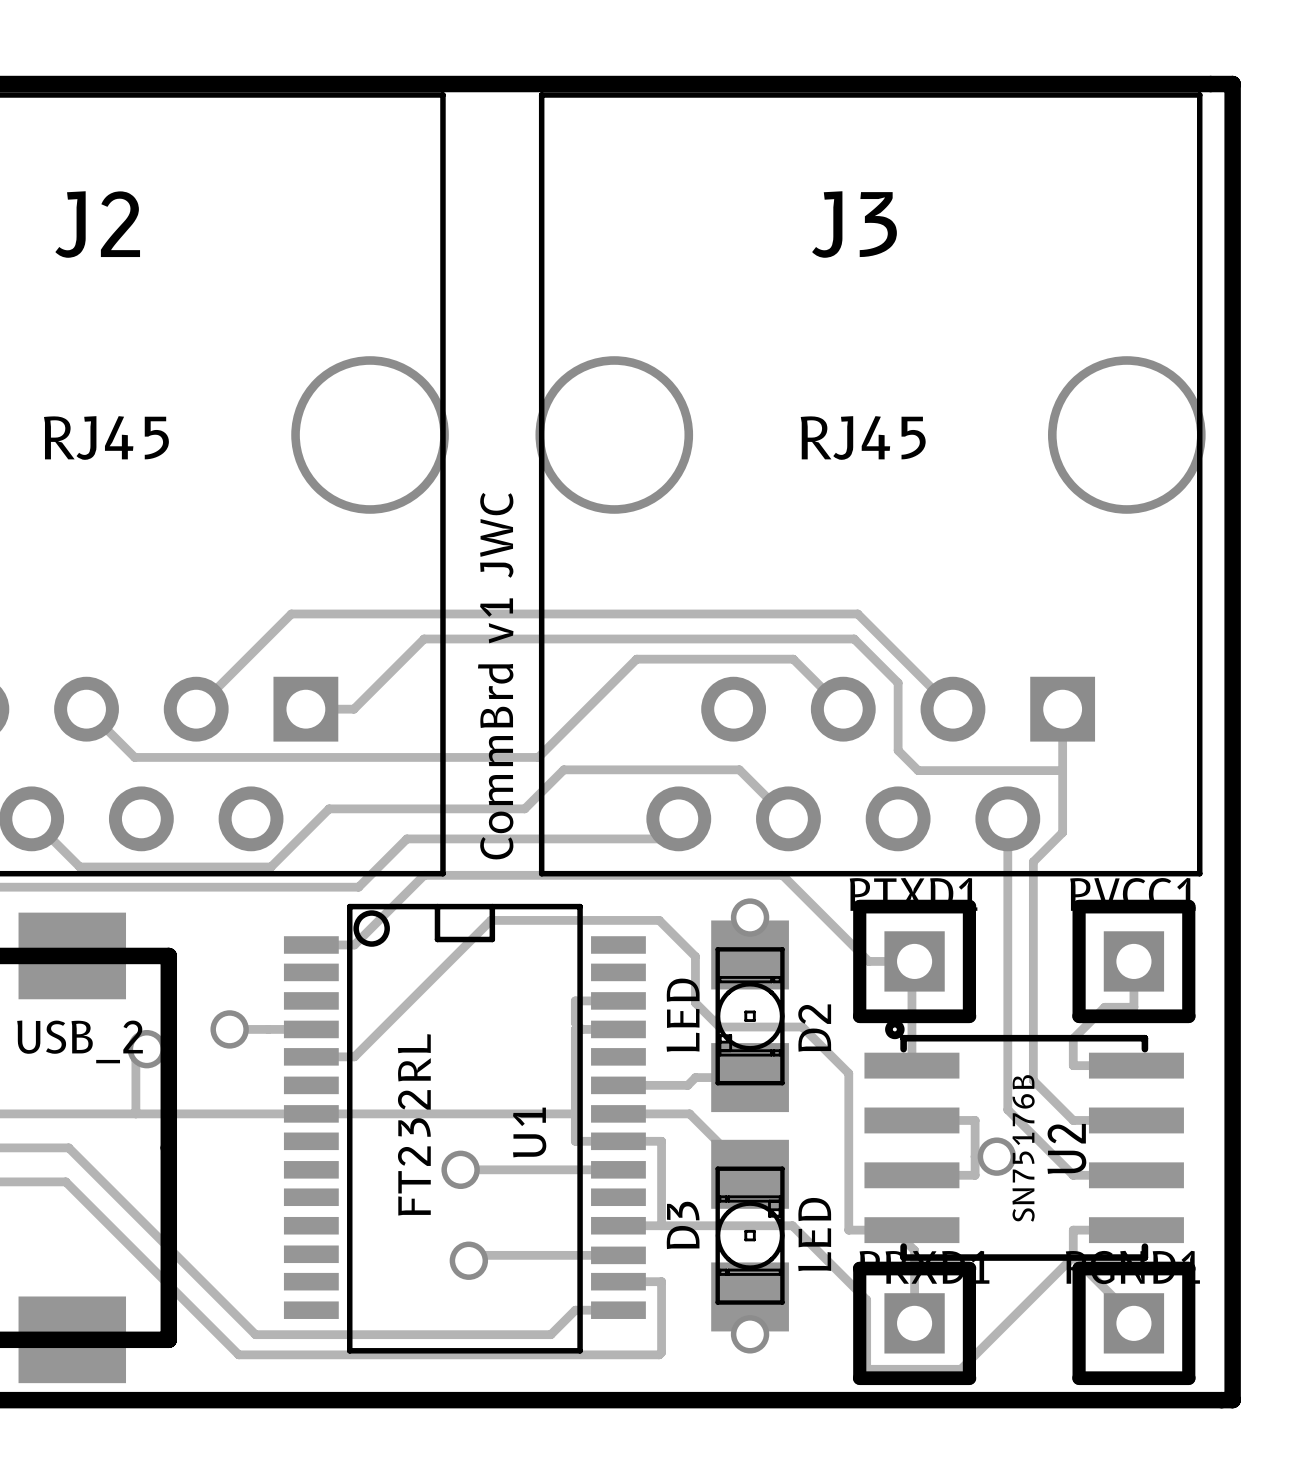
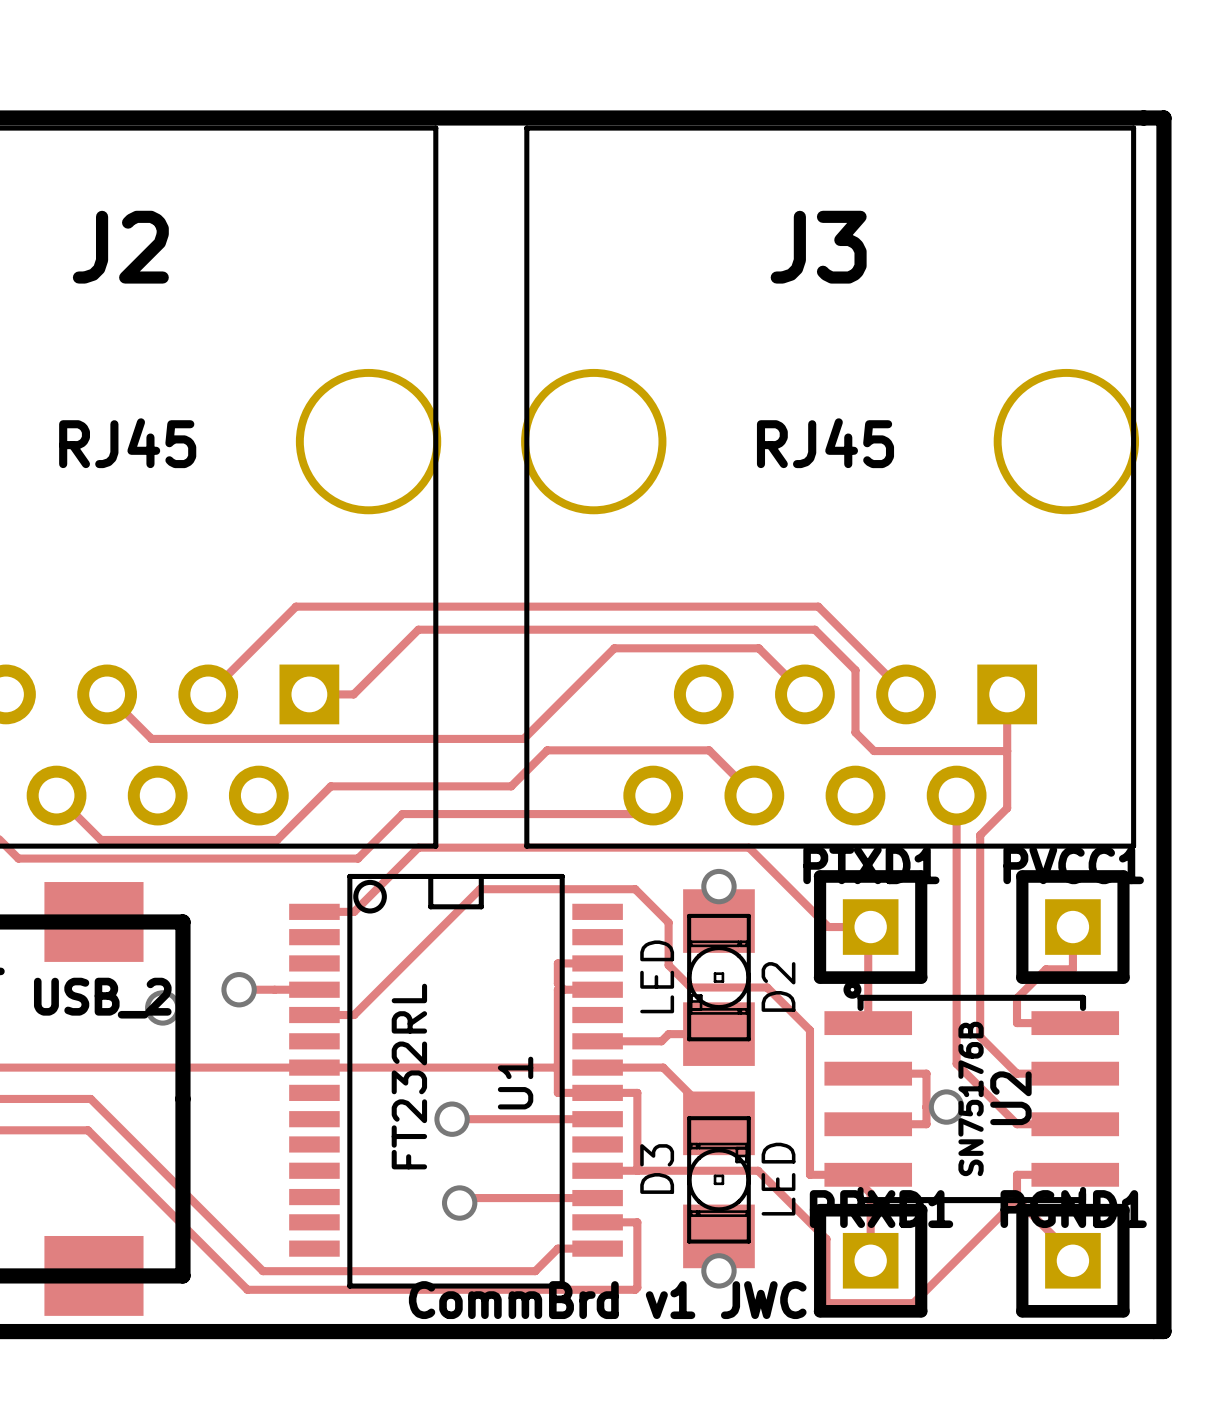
text rotation: 0° (495, 676) -> 90° clockwise (607, 1300)
text position: CommBrd v1 JWC (495, 676) -> CommBrd v1 JWC (607, 1300)
track: (146, 1049) (135, 1060) (135, 1113) -> none

